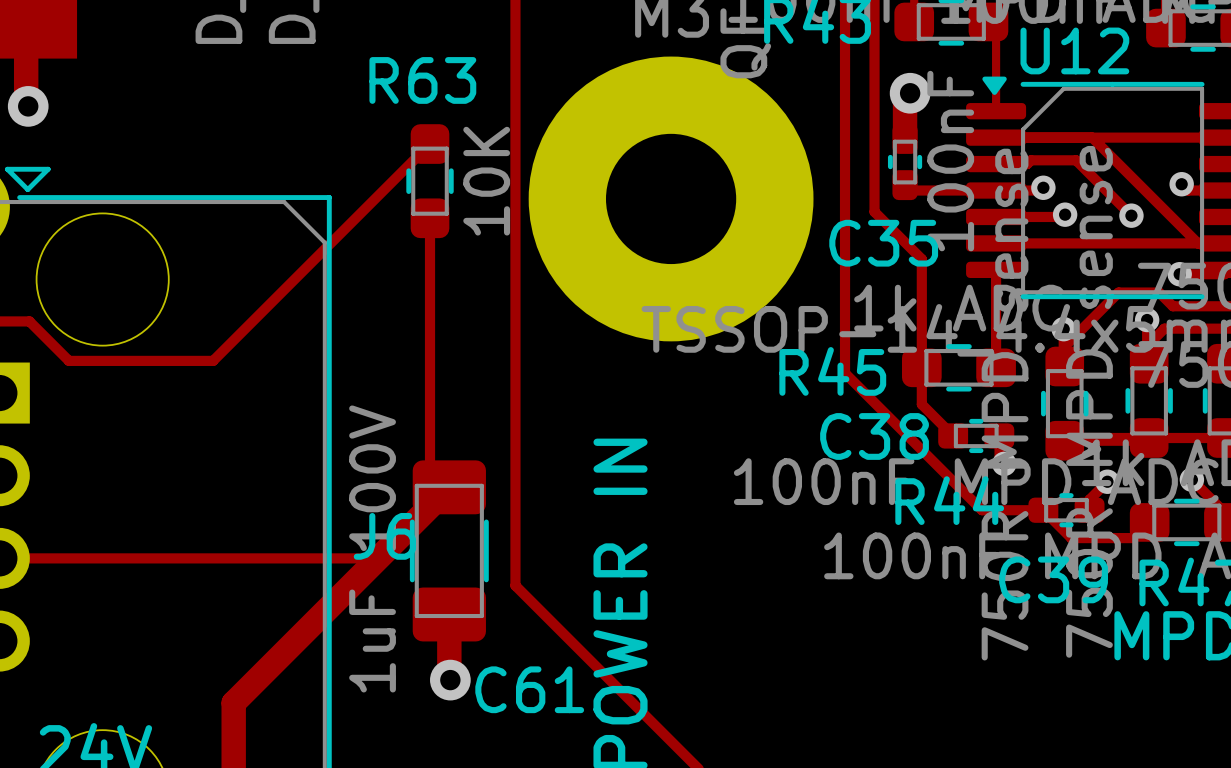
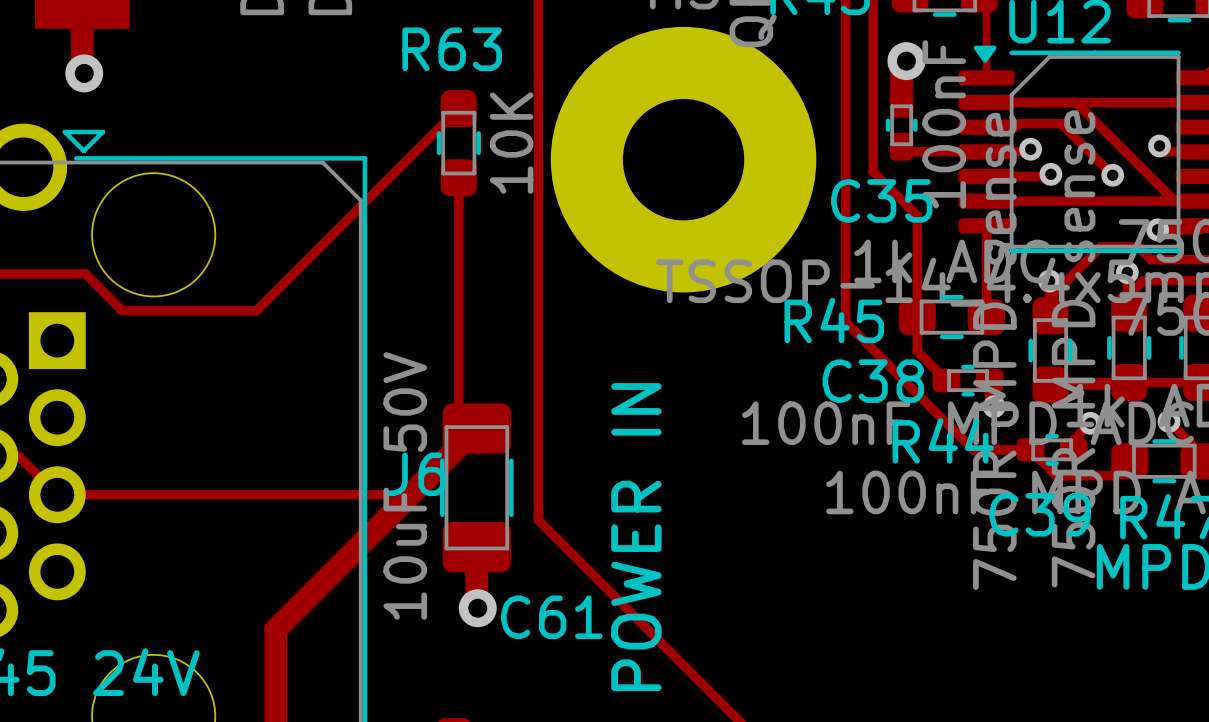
C61 value: 1uF 100V (372, 548) -> 10uF 50V (405, 485)

